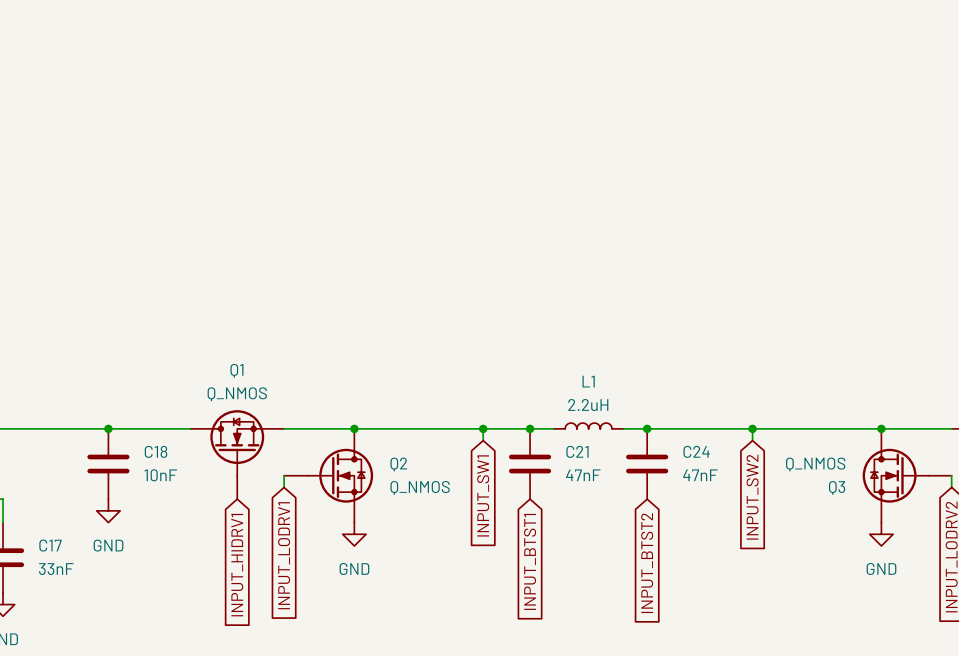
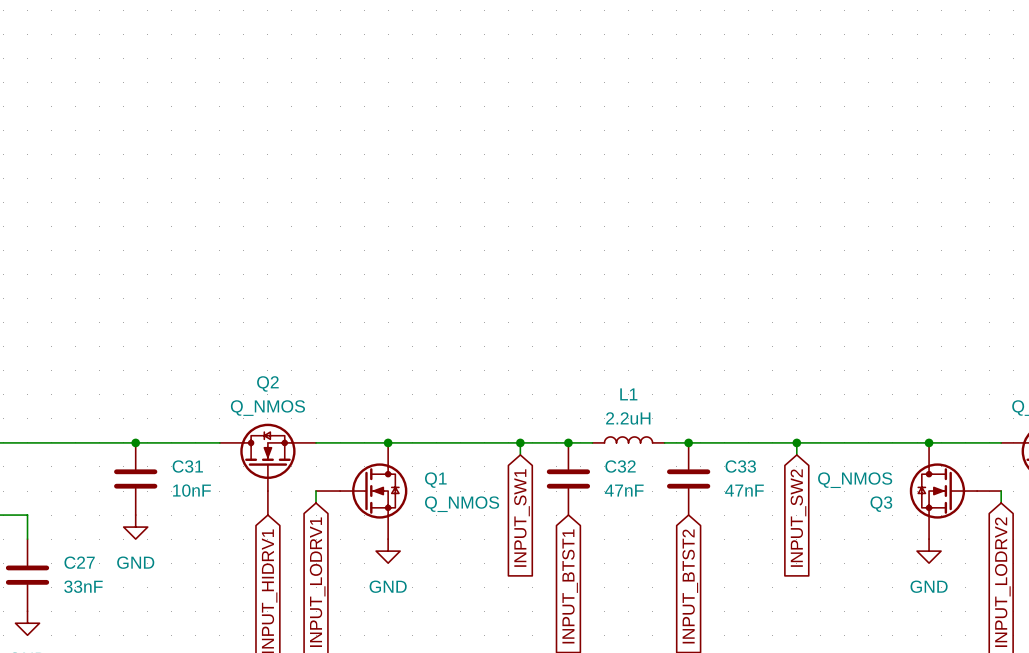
Q1 name: Q1 (236, 370) -> Q2 (267, 383)
C18 name: C18 (156, 451) -> C31 (187, 466)
C21 name: C21 (577, 451) -> C32 (620, 466)
C24 name: C24 (696, 451) -> C33 (740, 466)
Q2 name: Q2 (398, 464) -> Q1 (435, 480)
C17 name: C17 (50, 545) -> C27 (79, 562)

